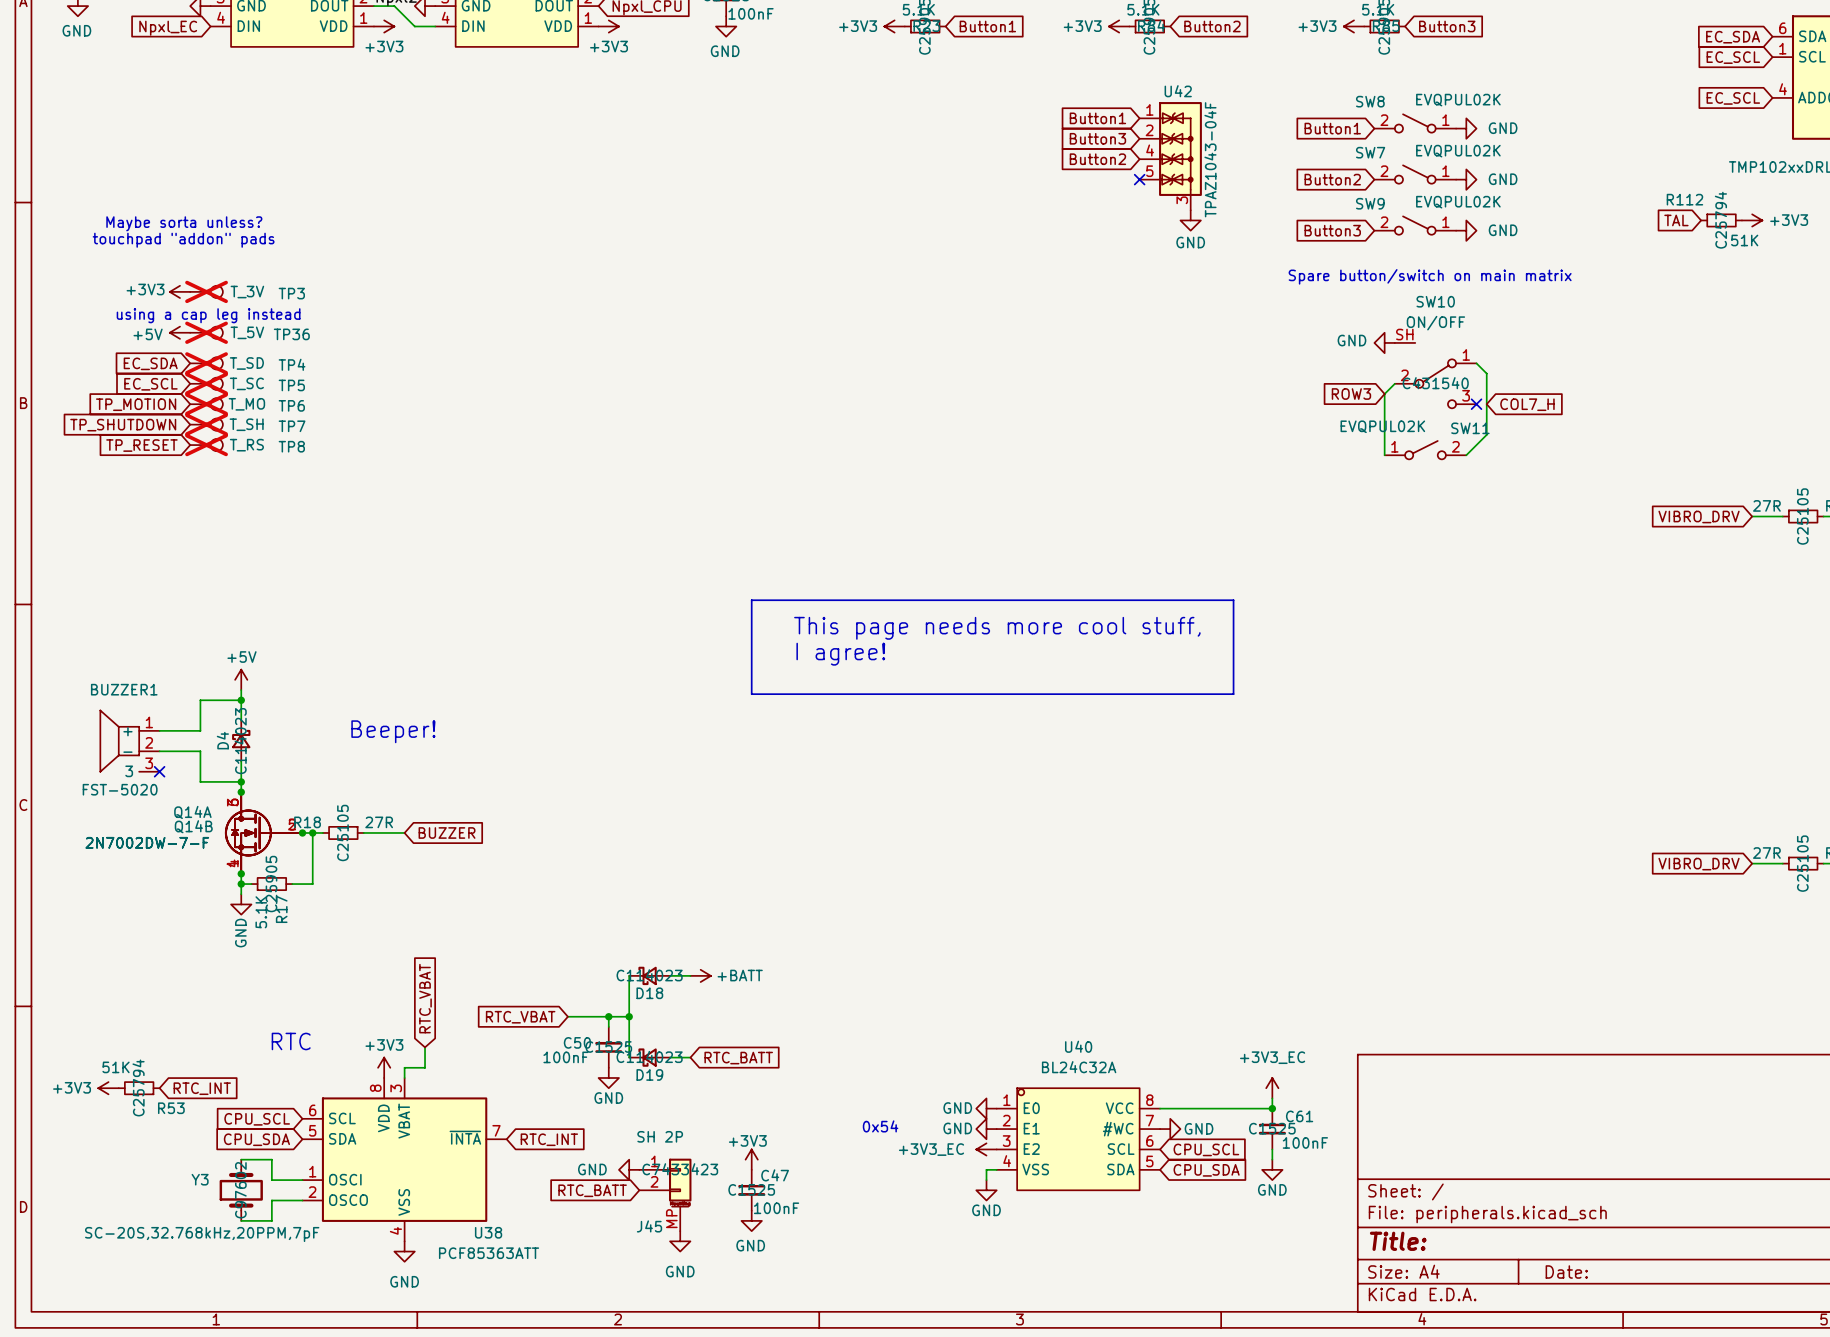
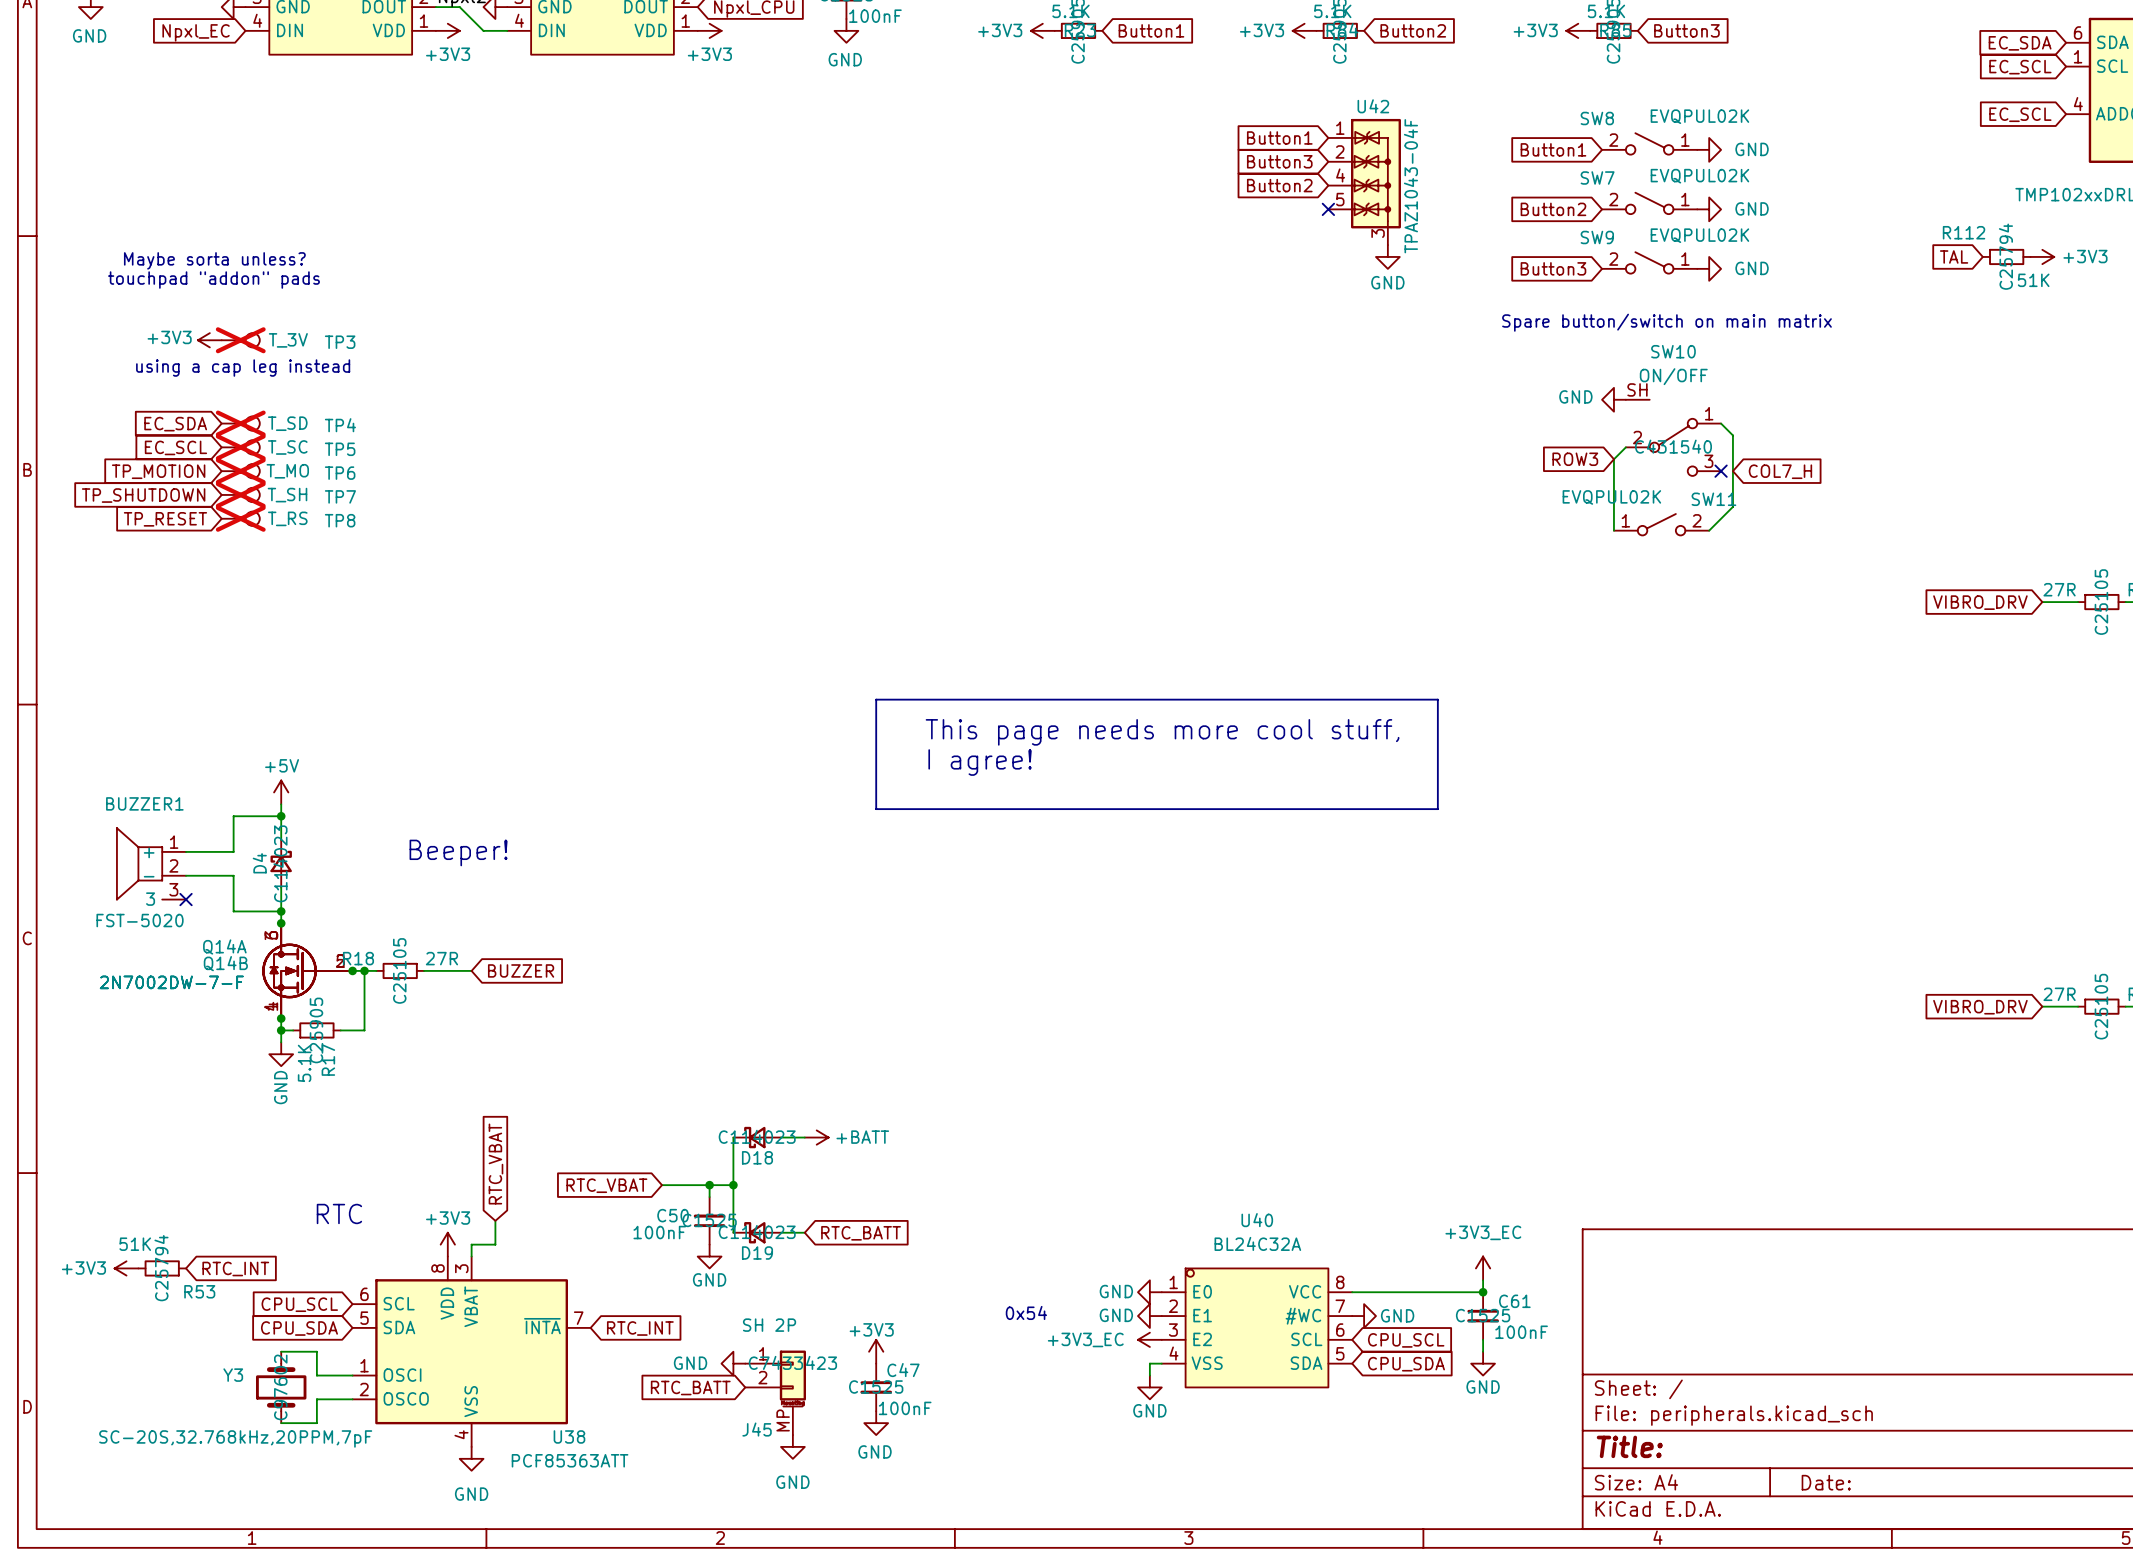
power symbol: +5V (180, 332) -> none
TP36: T_5V (206, 332) -> none

